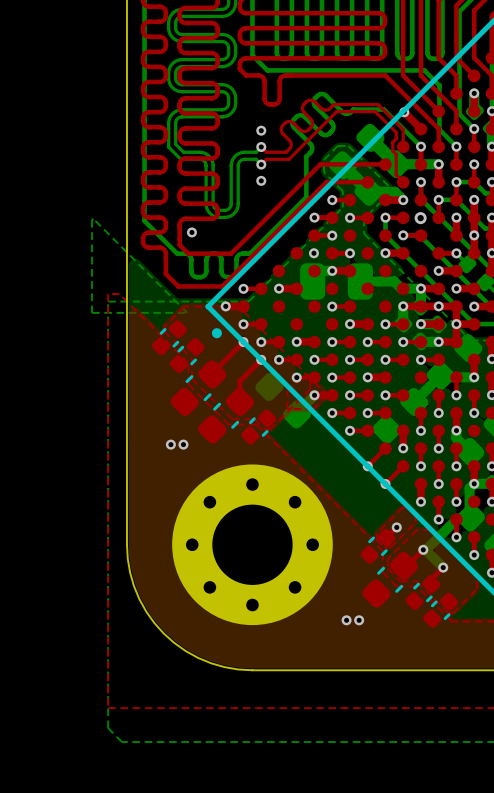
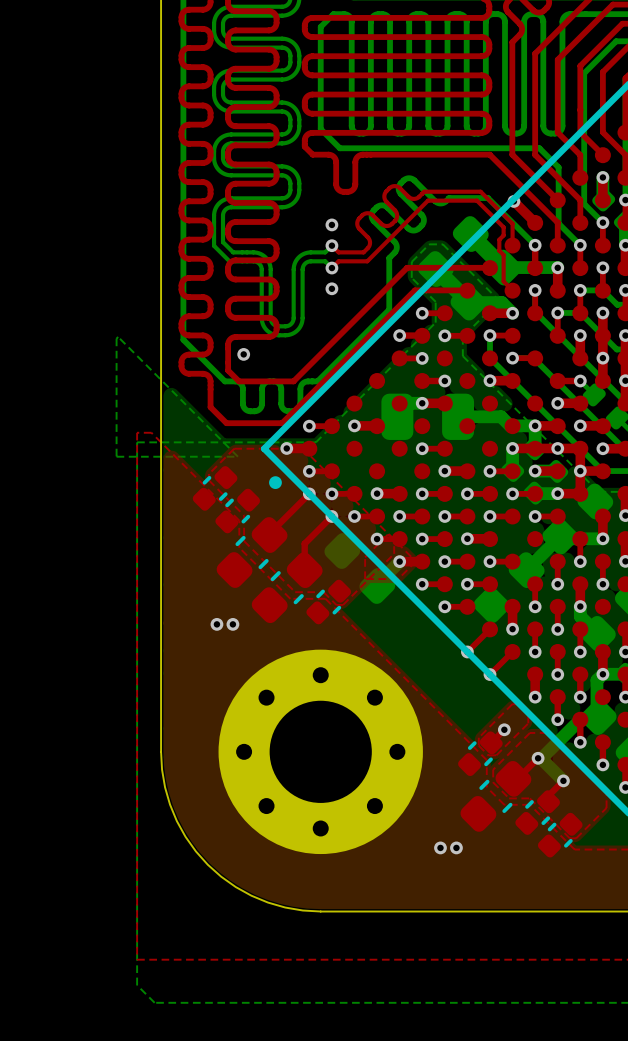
via: (420, 218) -> none
via: (313, 253) -> none

